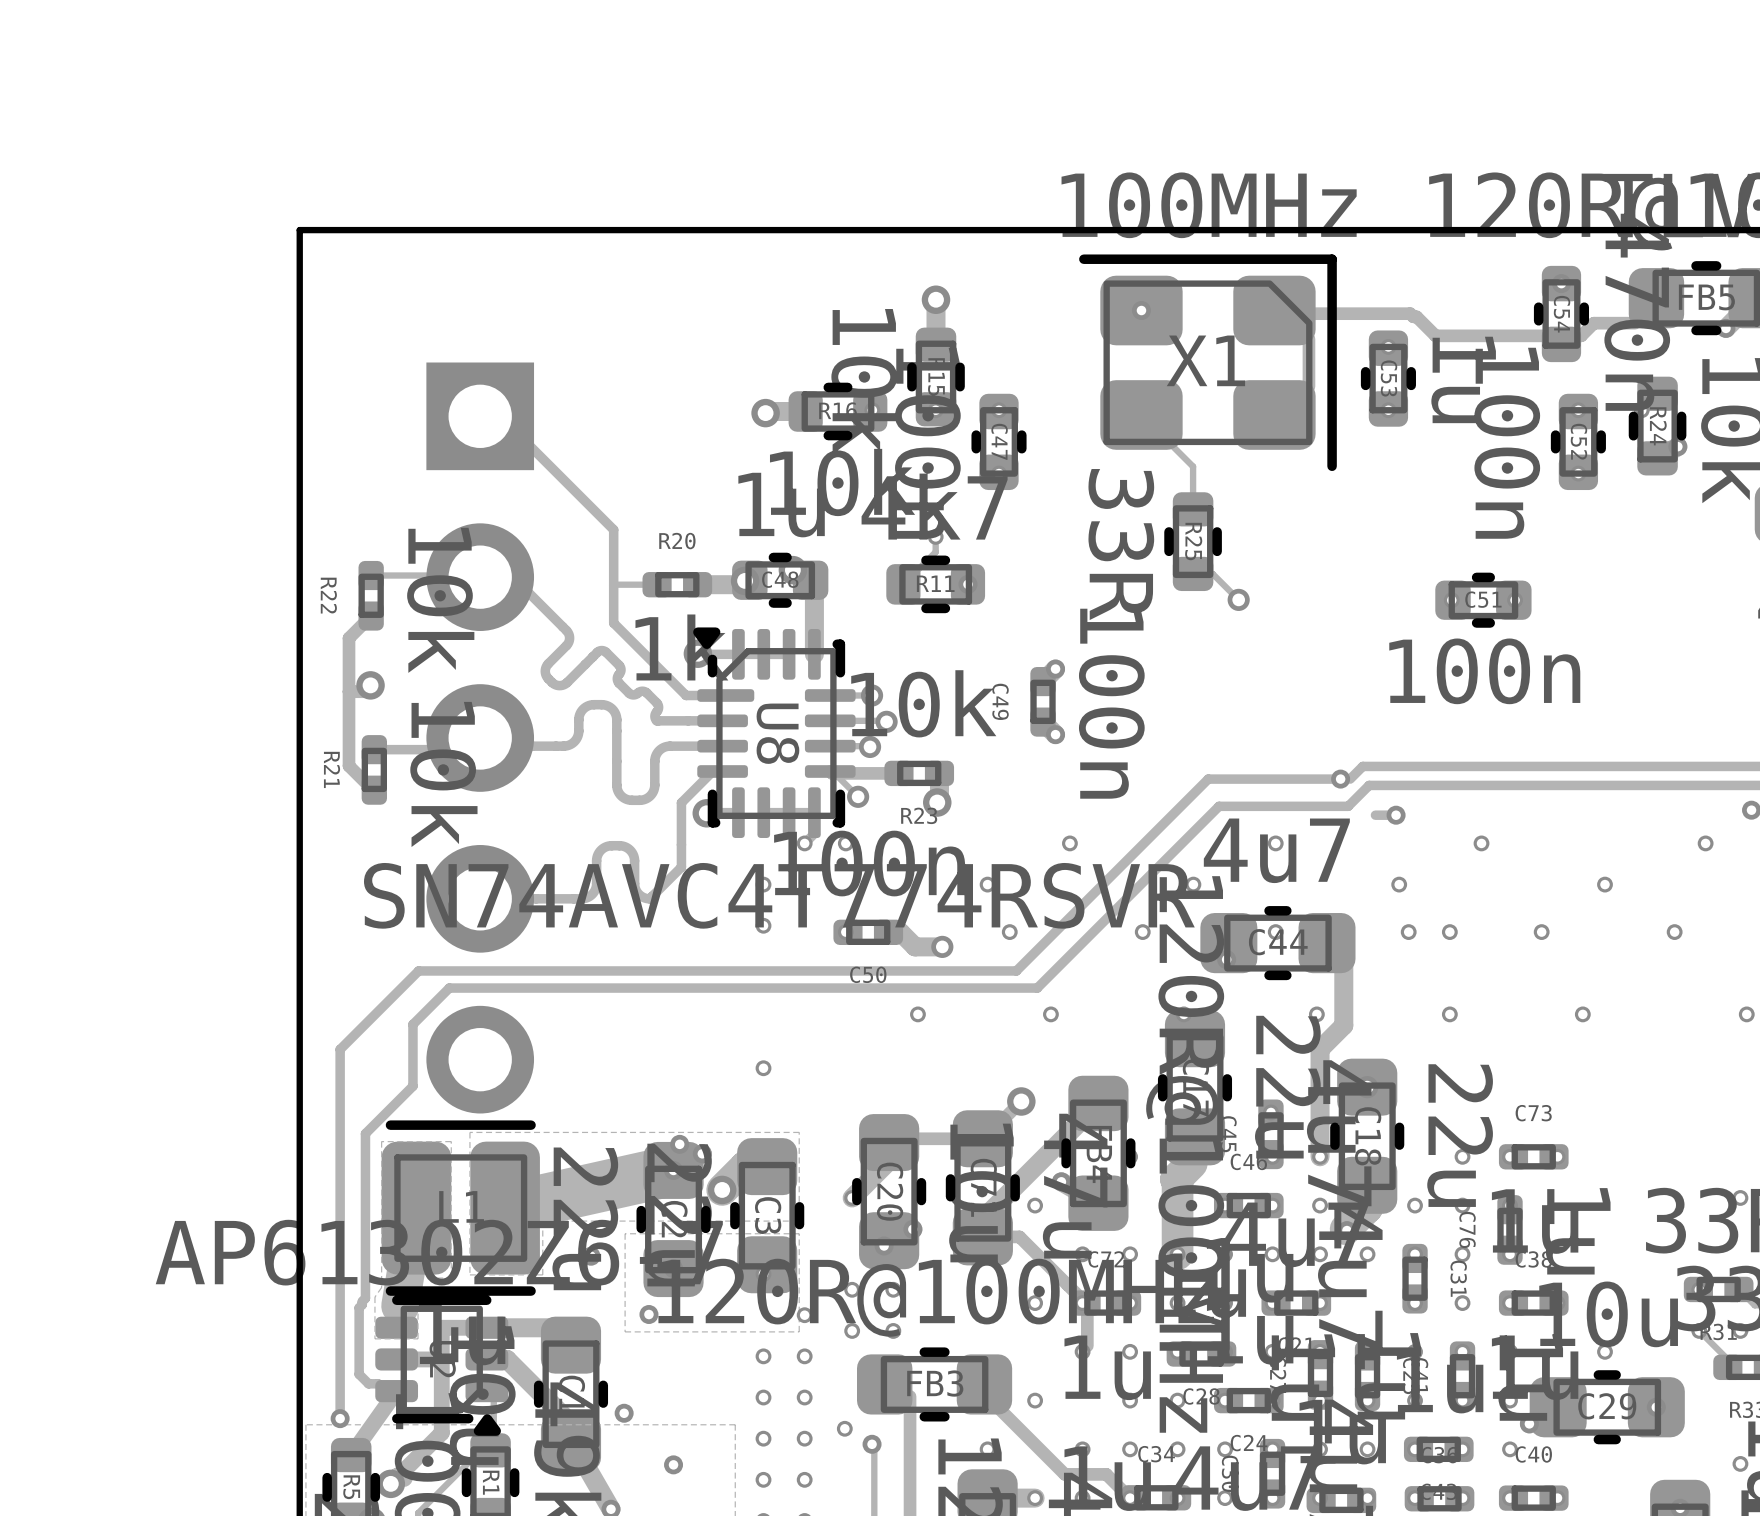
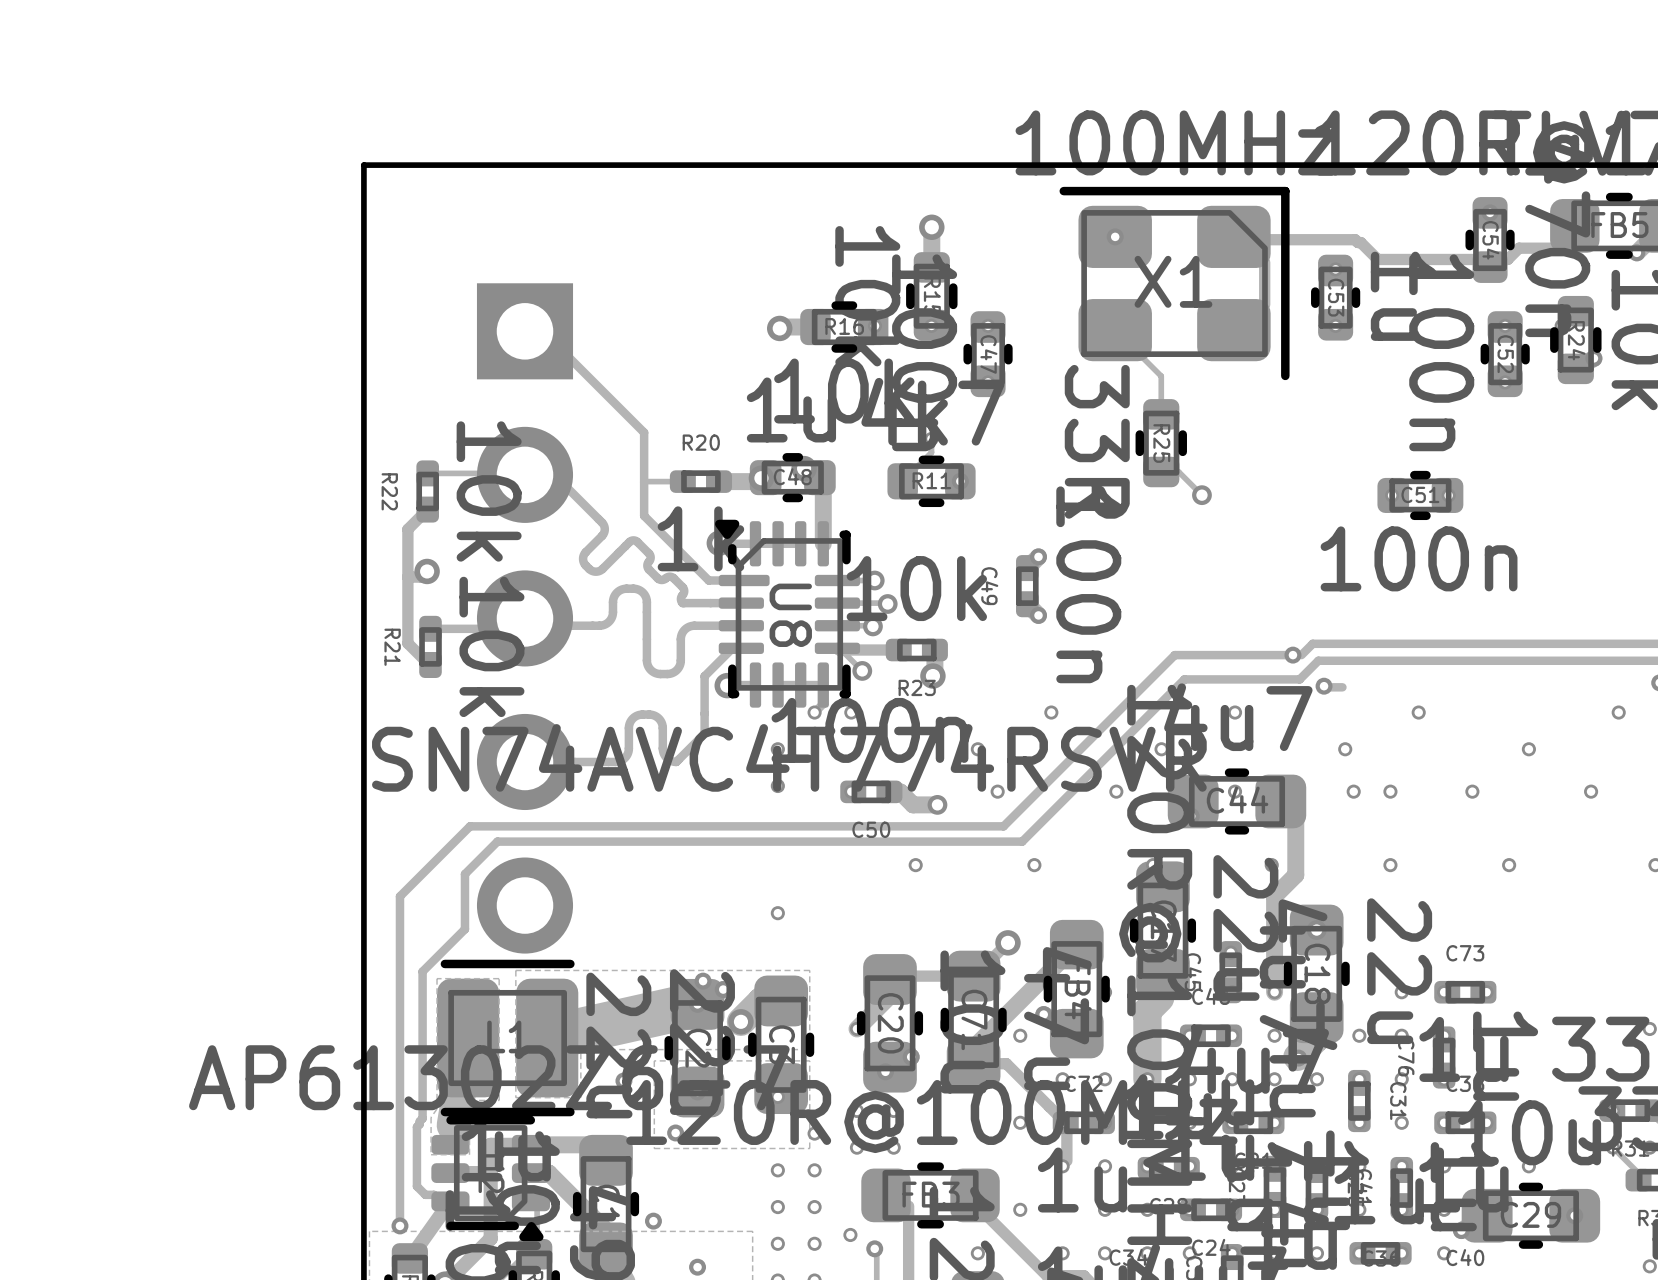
via position: (1396, 815) -> (1324, 686)

